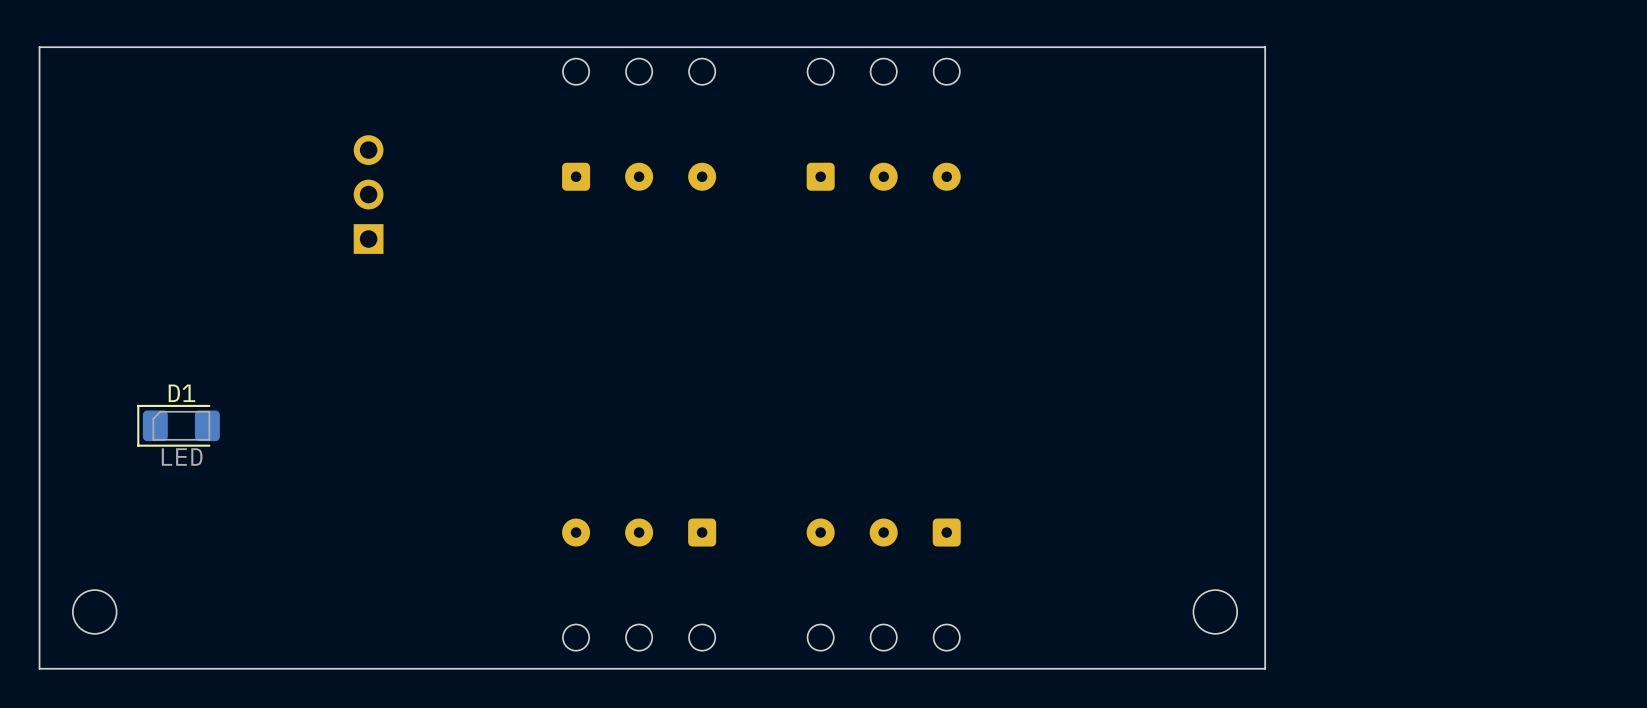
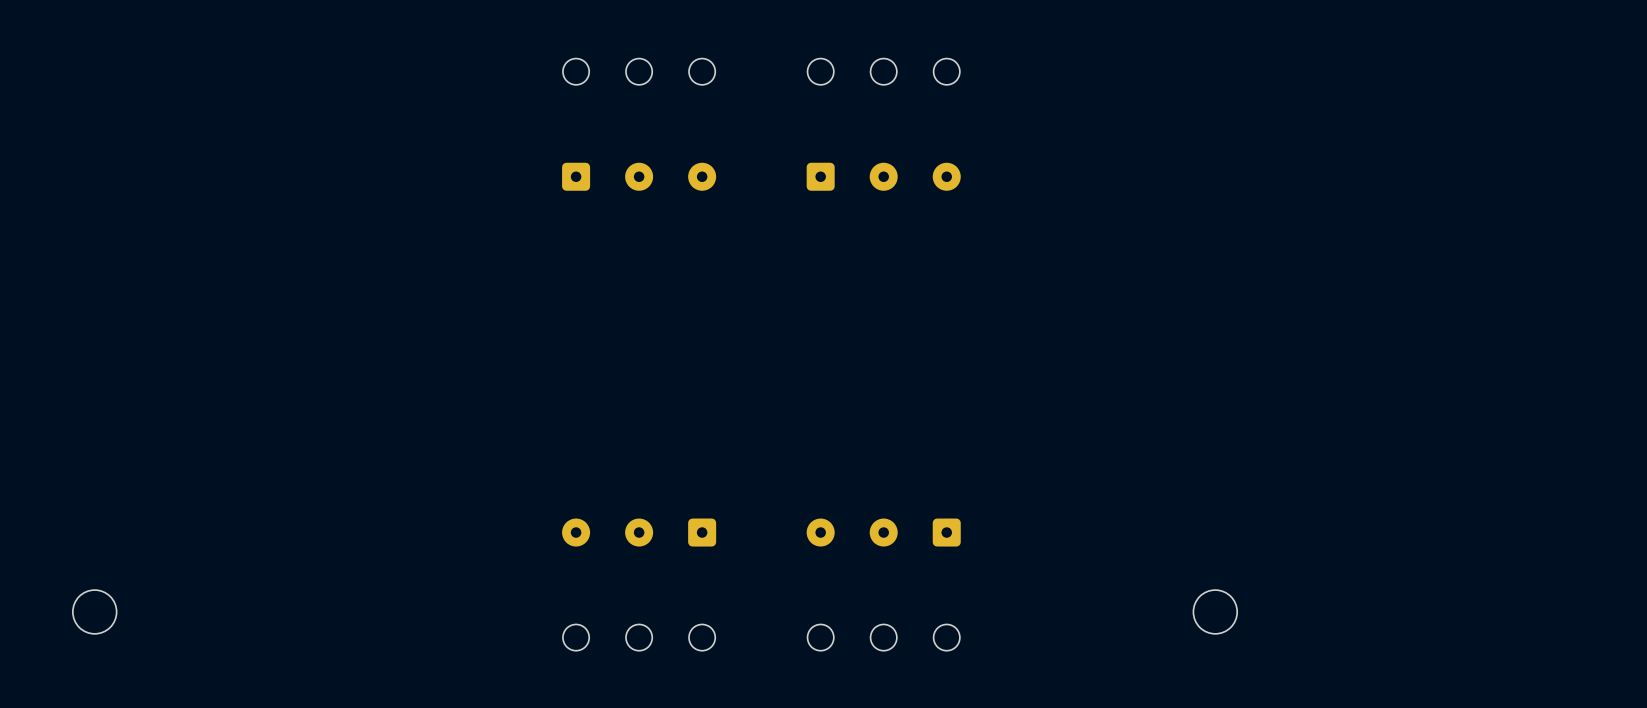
board edge: (1265, 47) (39, 47) (39, 668) (1265, 668) (1265, 47) -> none
part: (368, 194) -> none
D1: LED (178, 425) -> none

